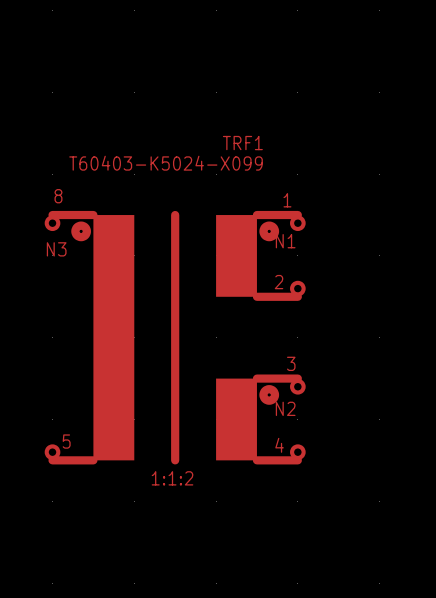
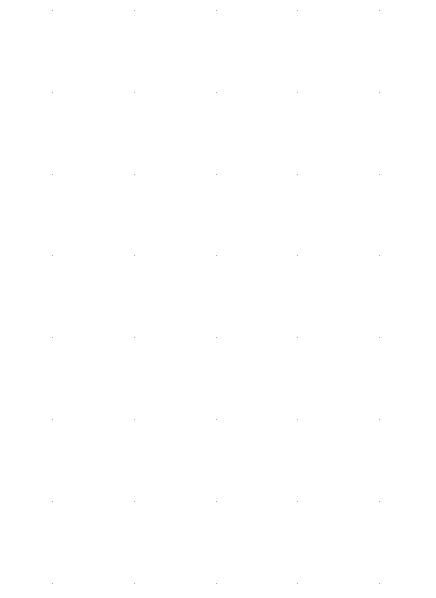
TRF1: T60403-K5024-X099 (175, 337) -> none

